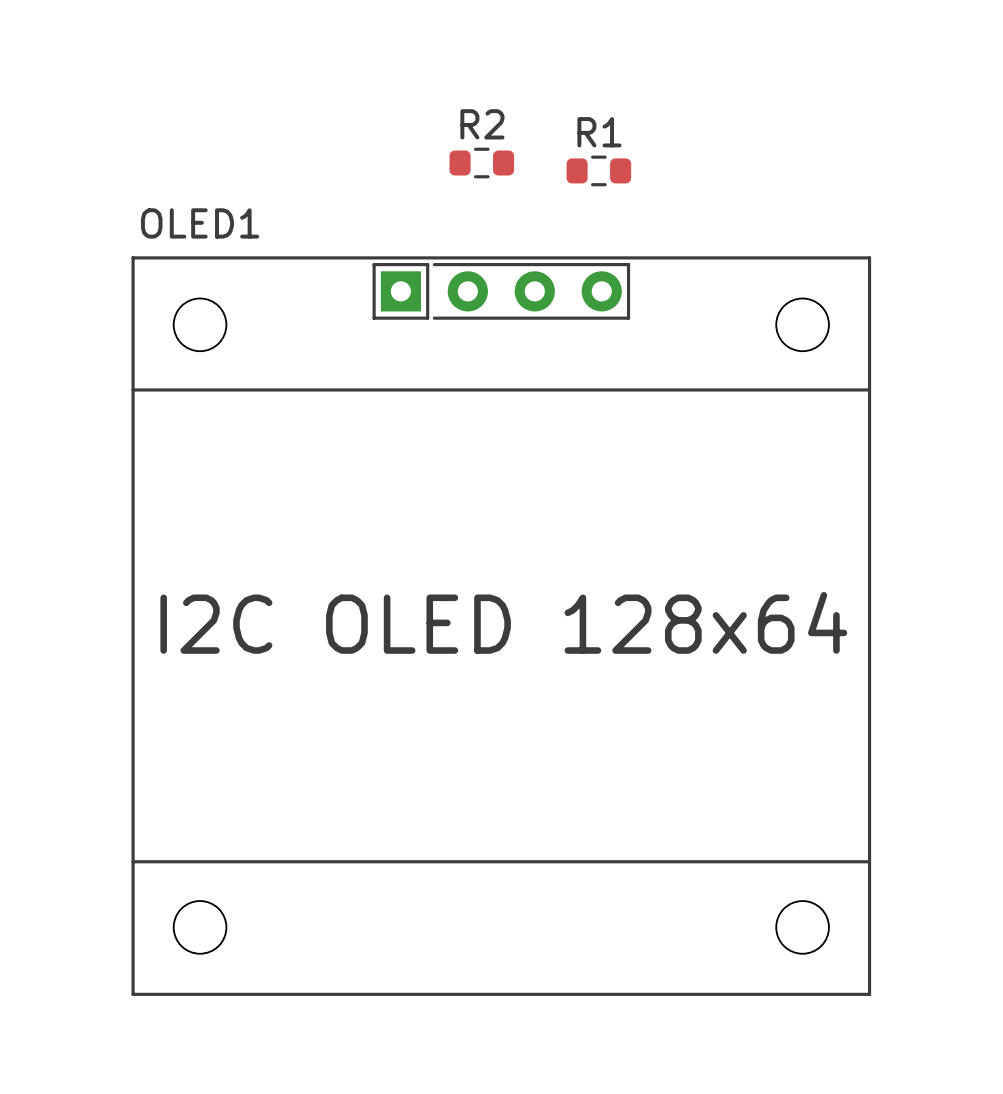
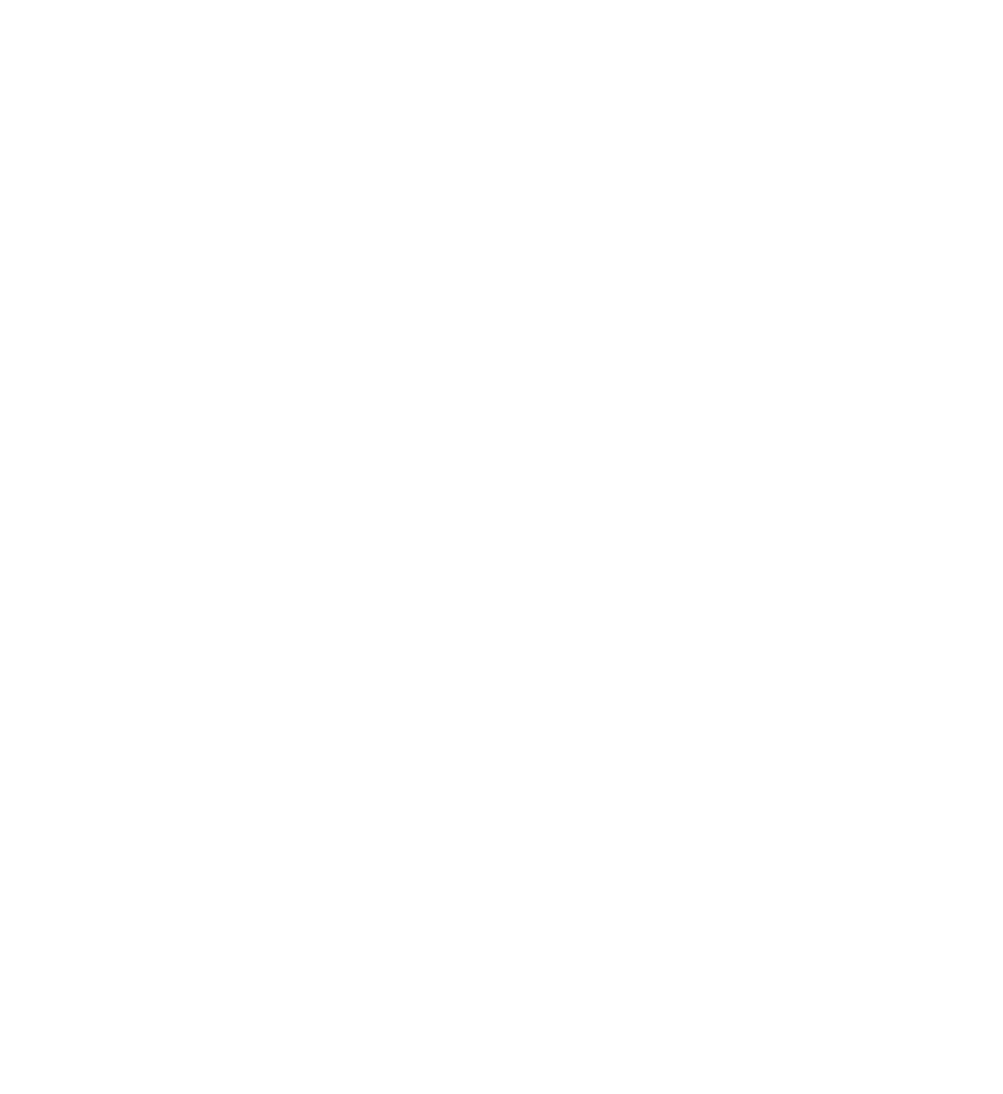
R2: (481, 163) -> none
R1: (598, 170) -> none
OLED1: (501, 626) -> none

